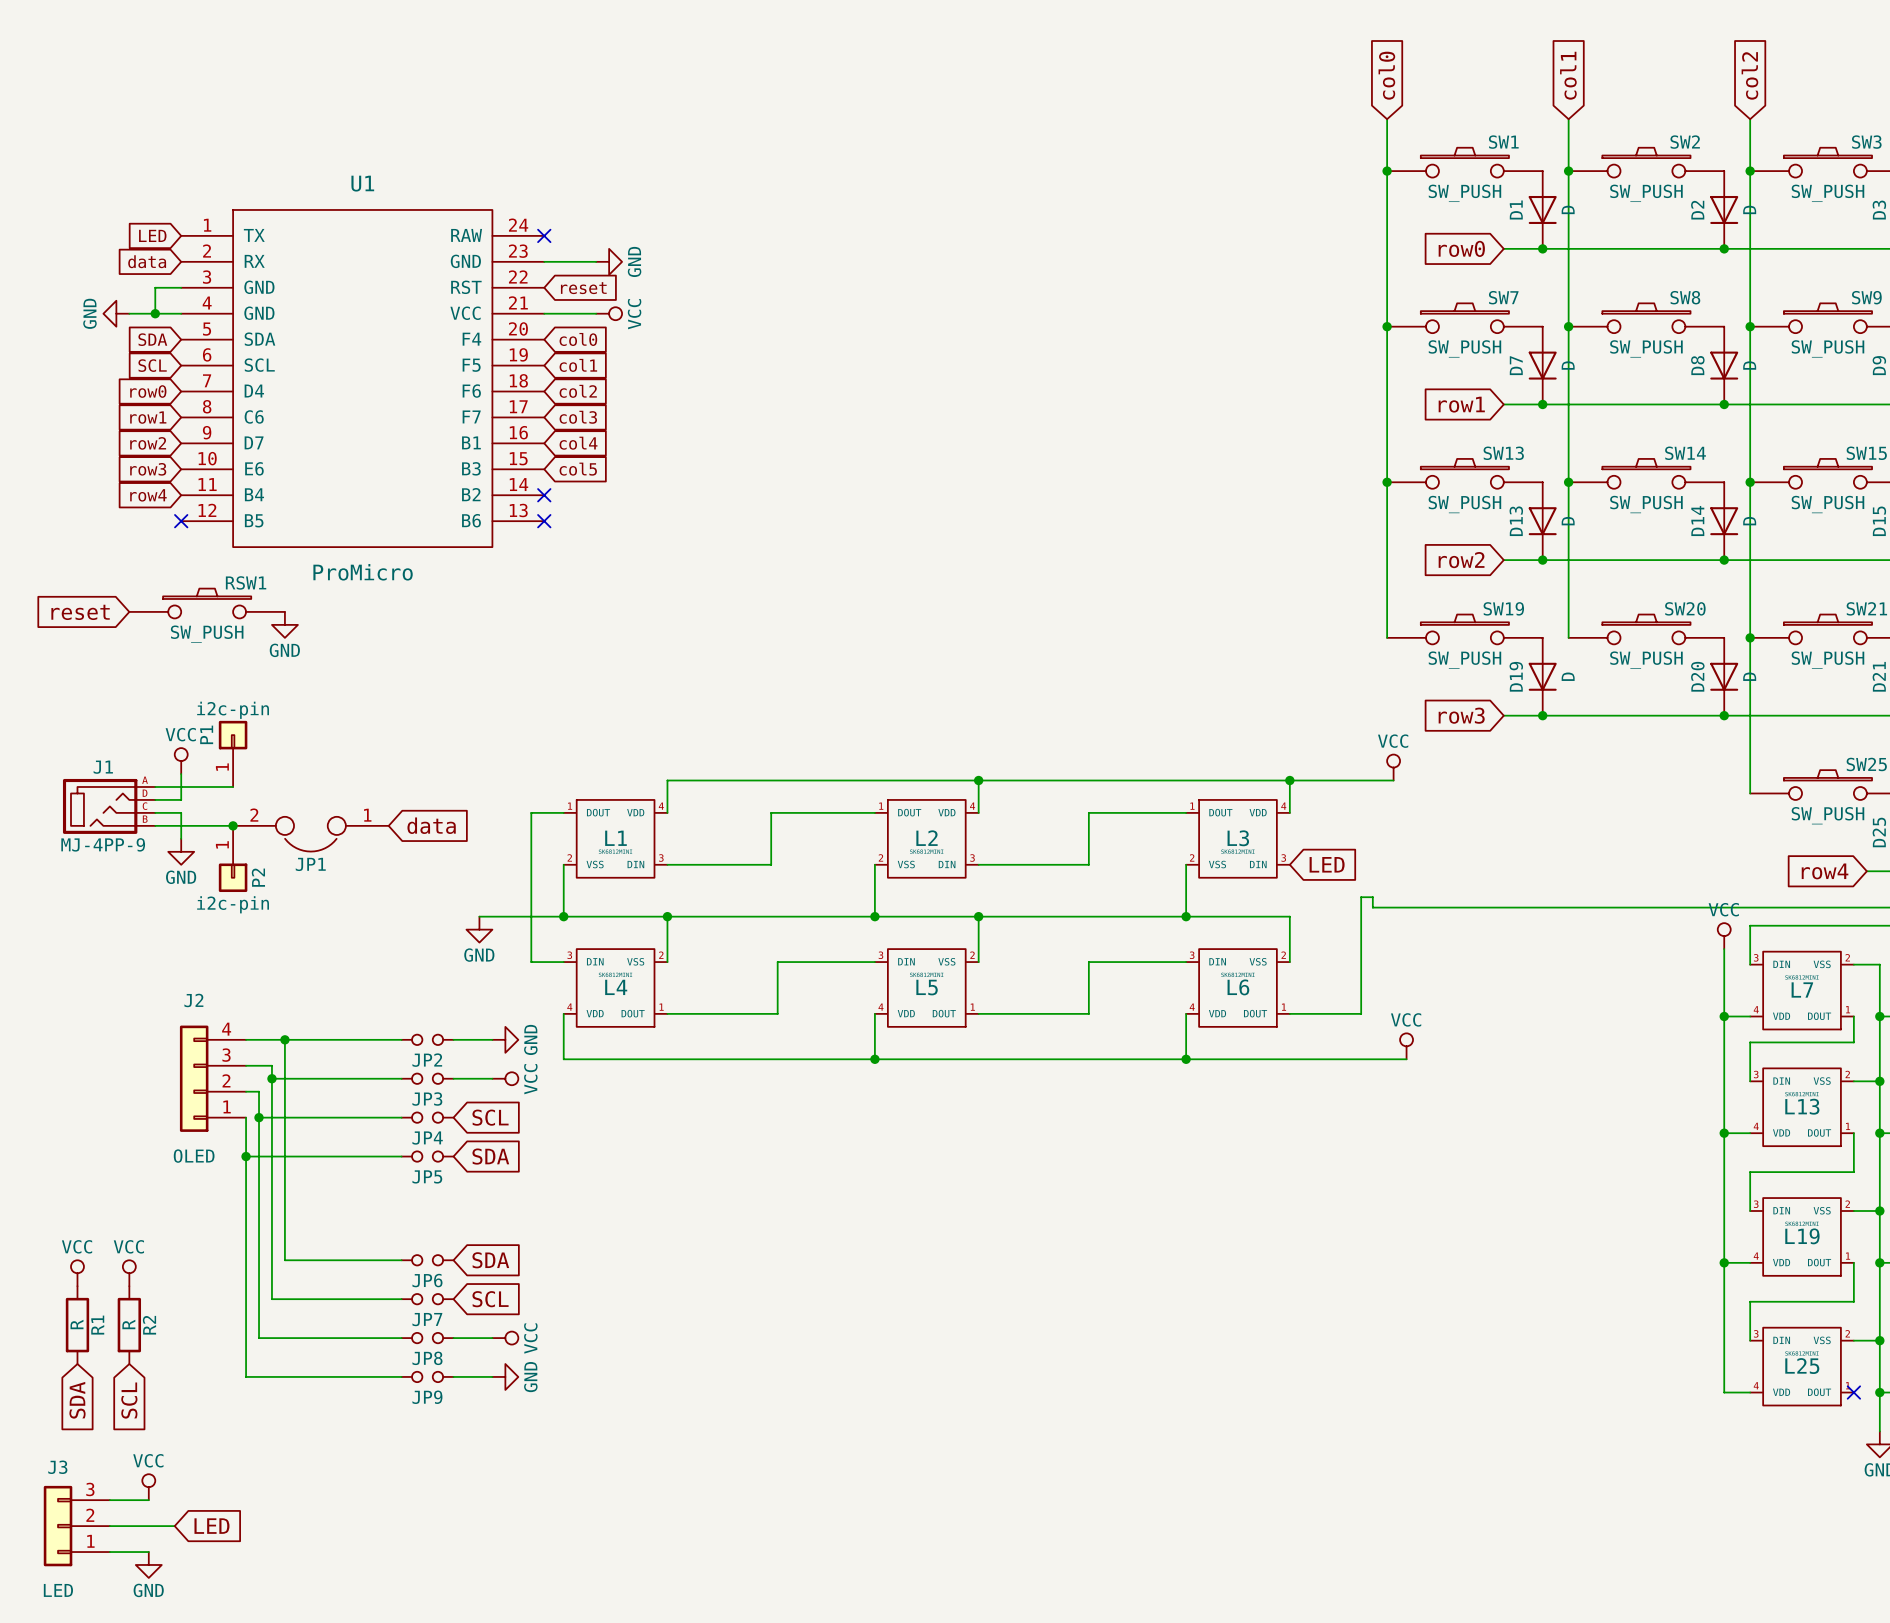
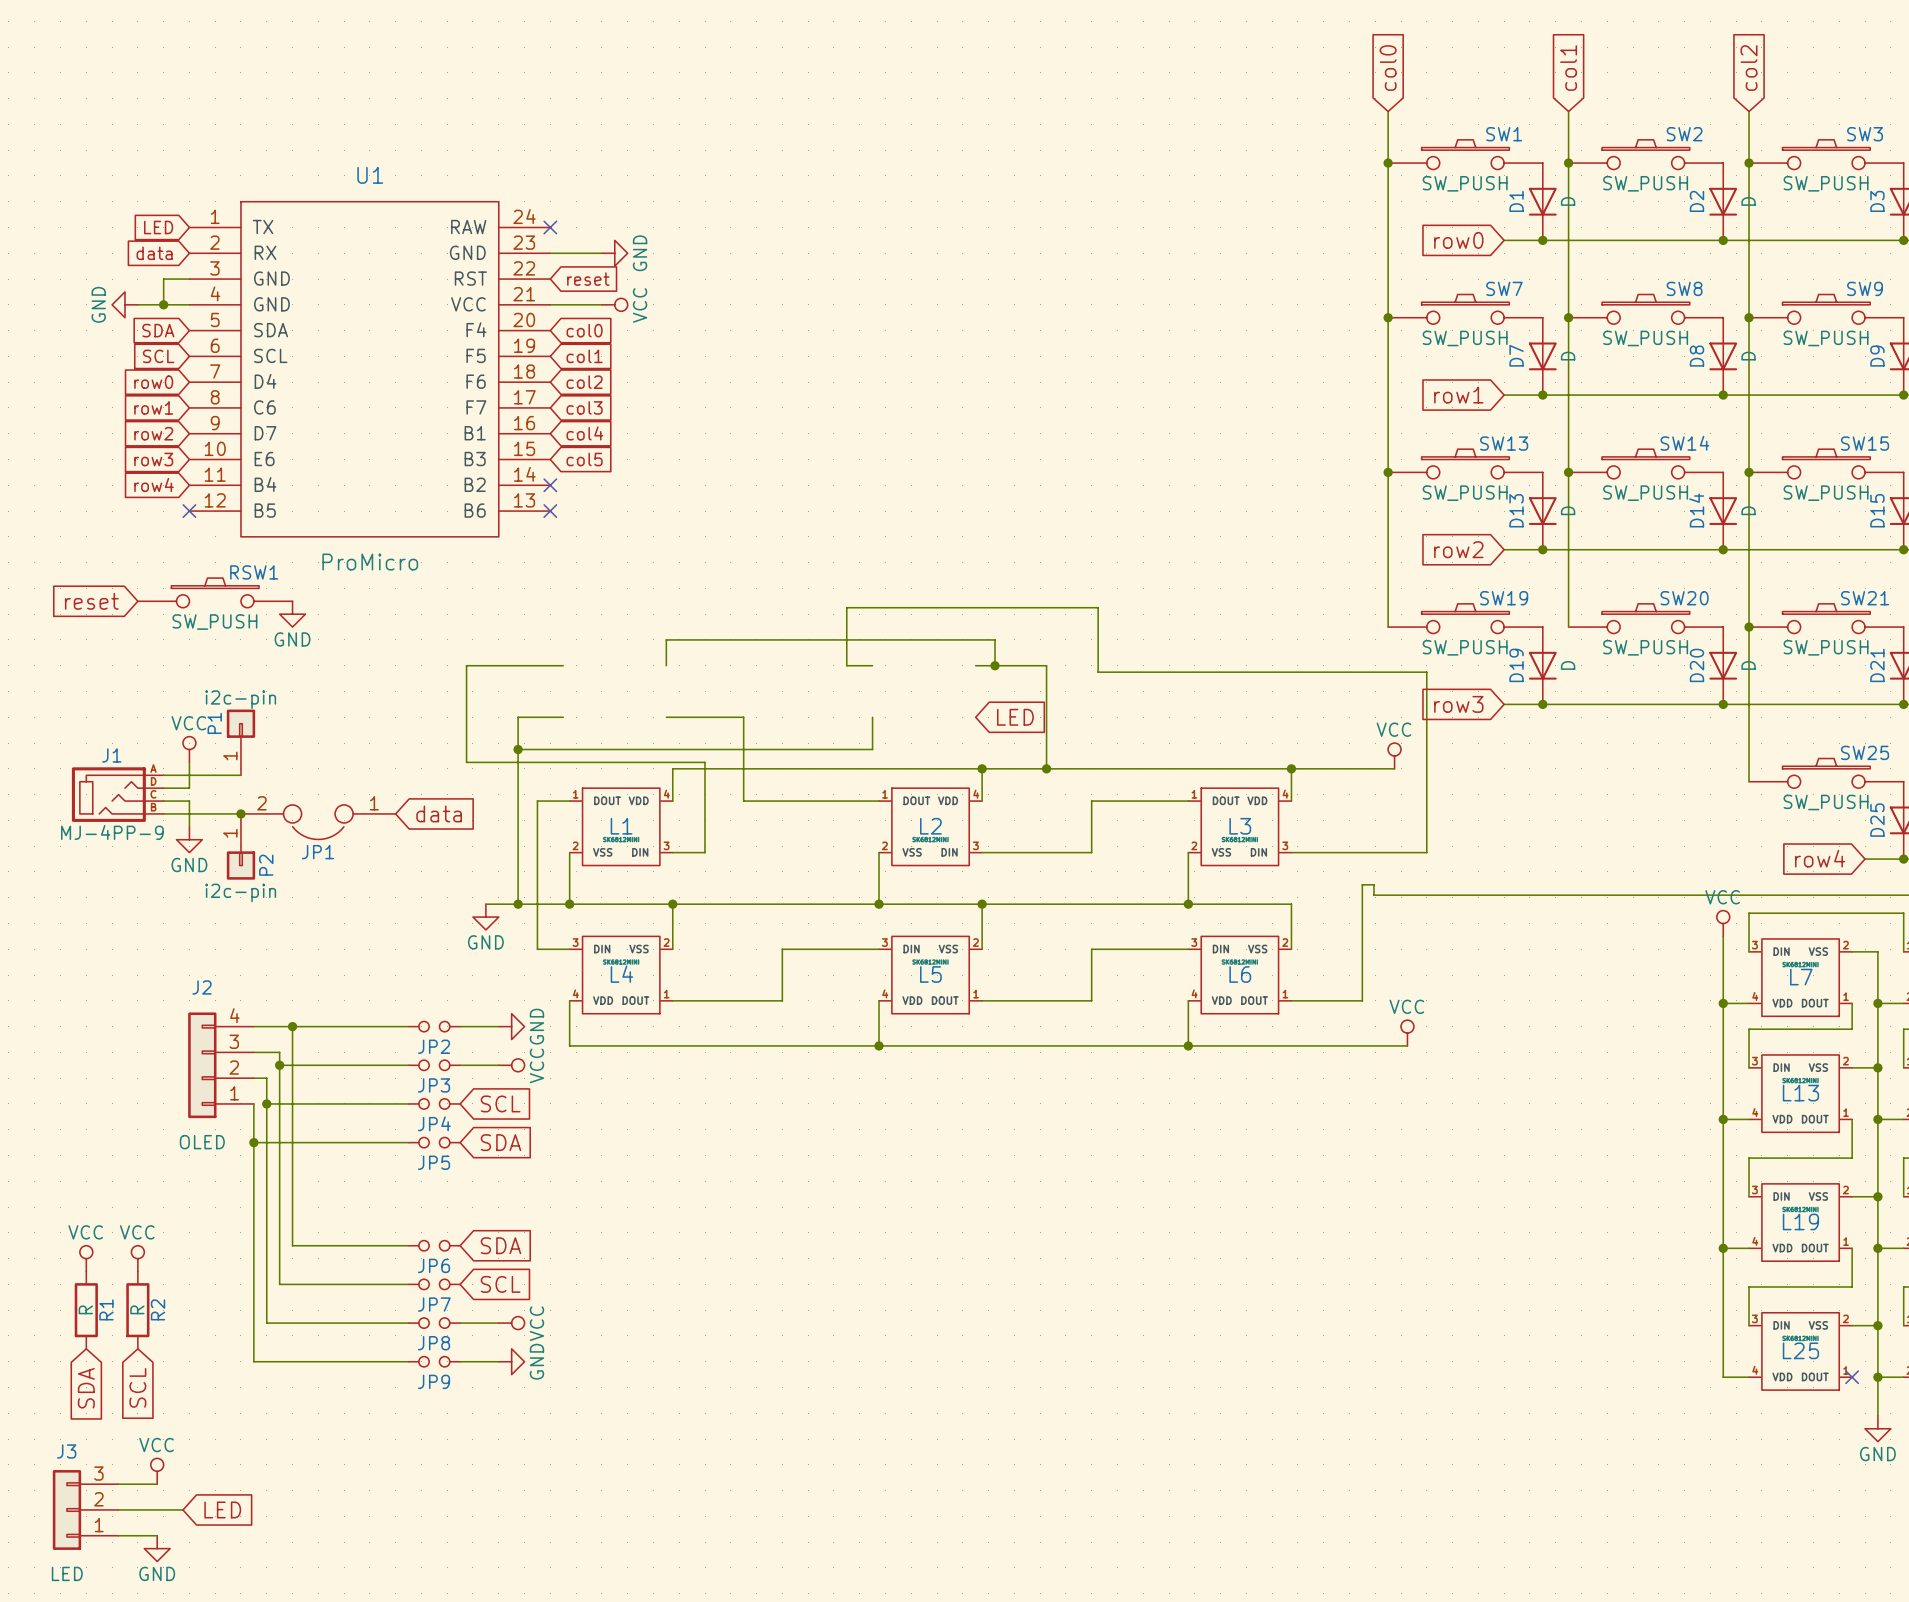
wire: none -> (563, 665) (466, 665) (466, 762) (705, 762) (705, 852)
wire: none -> (666, 665) (666, 639) (995, 639) (995, 665)
wire: none -> (872, 665) (846, 665) (846, 607) (1098, 607) (1098, 672) (1426, 672) (1426, 852) (1291, 852)
wire: none -> (975, 665) (1046, 665) (1046, 768)
junction: none -> (995, 665)
wire: none -> (563, 717) (518, 717) (518, 904)
wire: none -> (872, 717) (872, 749) (518, 749)
global label: none -> LED (1015, 717)
junction: none -> (518, 749)
junction: none -> (1046, 768)
wire: (771, 812) (771, 864) (699, 864) -> (775, 801) (743, 801) (743, 717) (666, 717)
global label: LED (1327, 864) -> none
junction: none -> (518, 904)

